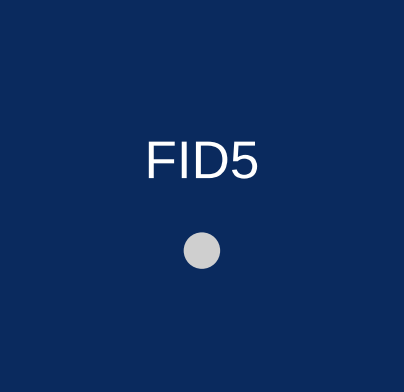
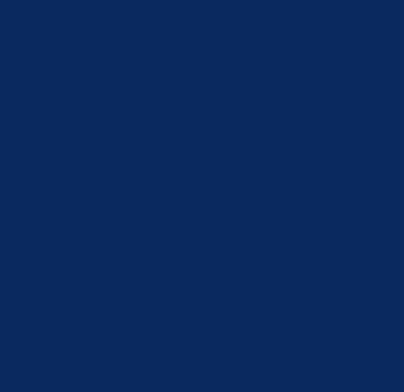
FID5: (201, 250) -> none

